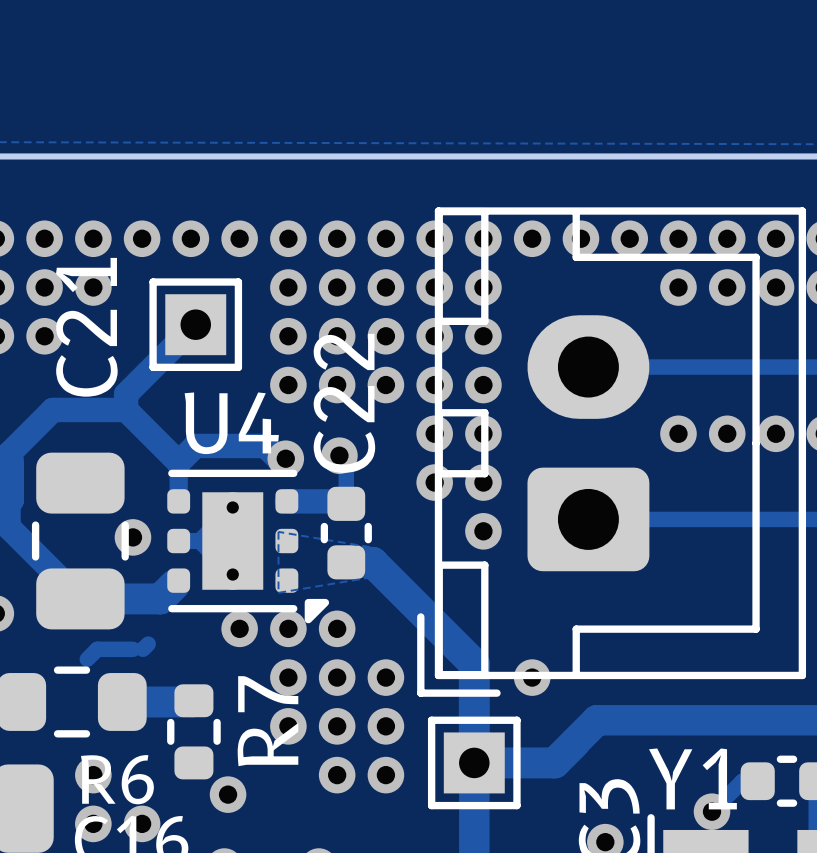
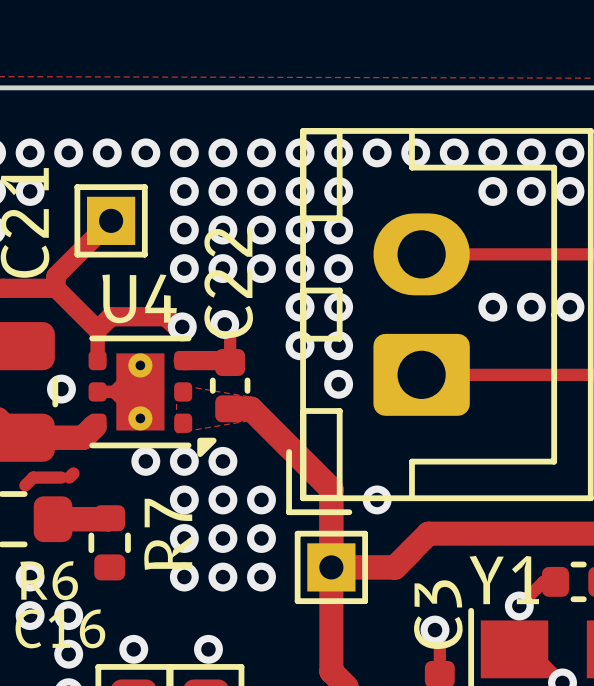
via position: (228, 794) -> (184, 577)

